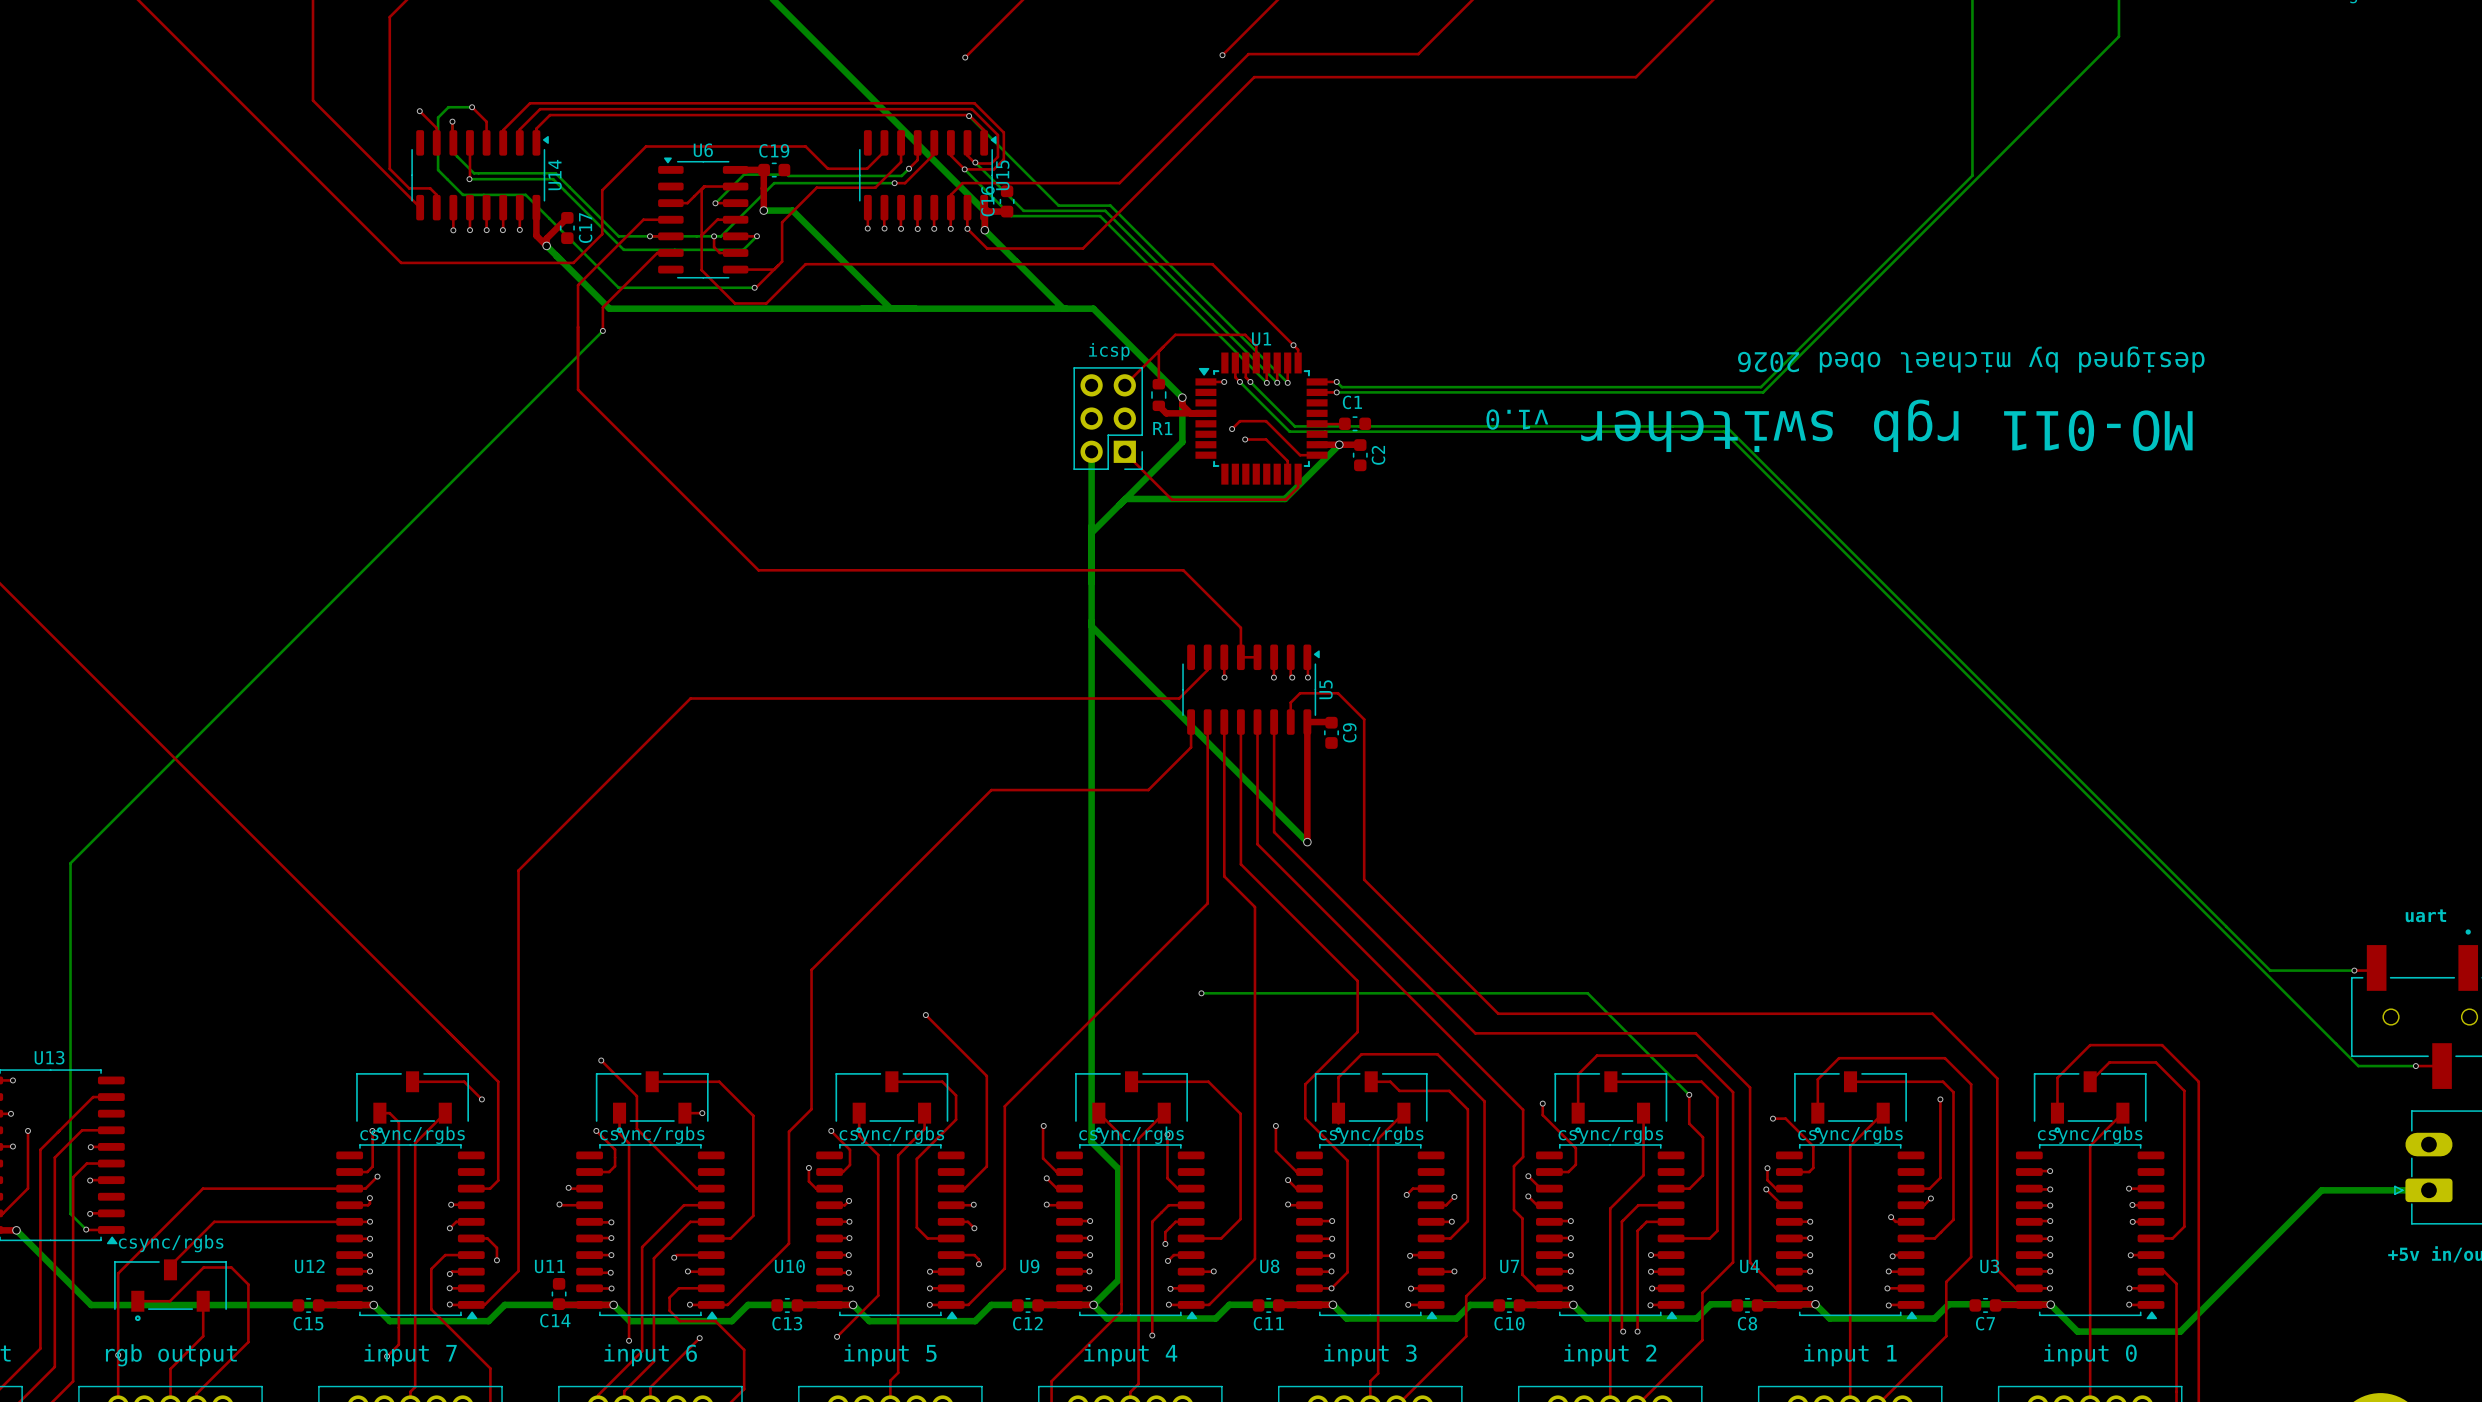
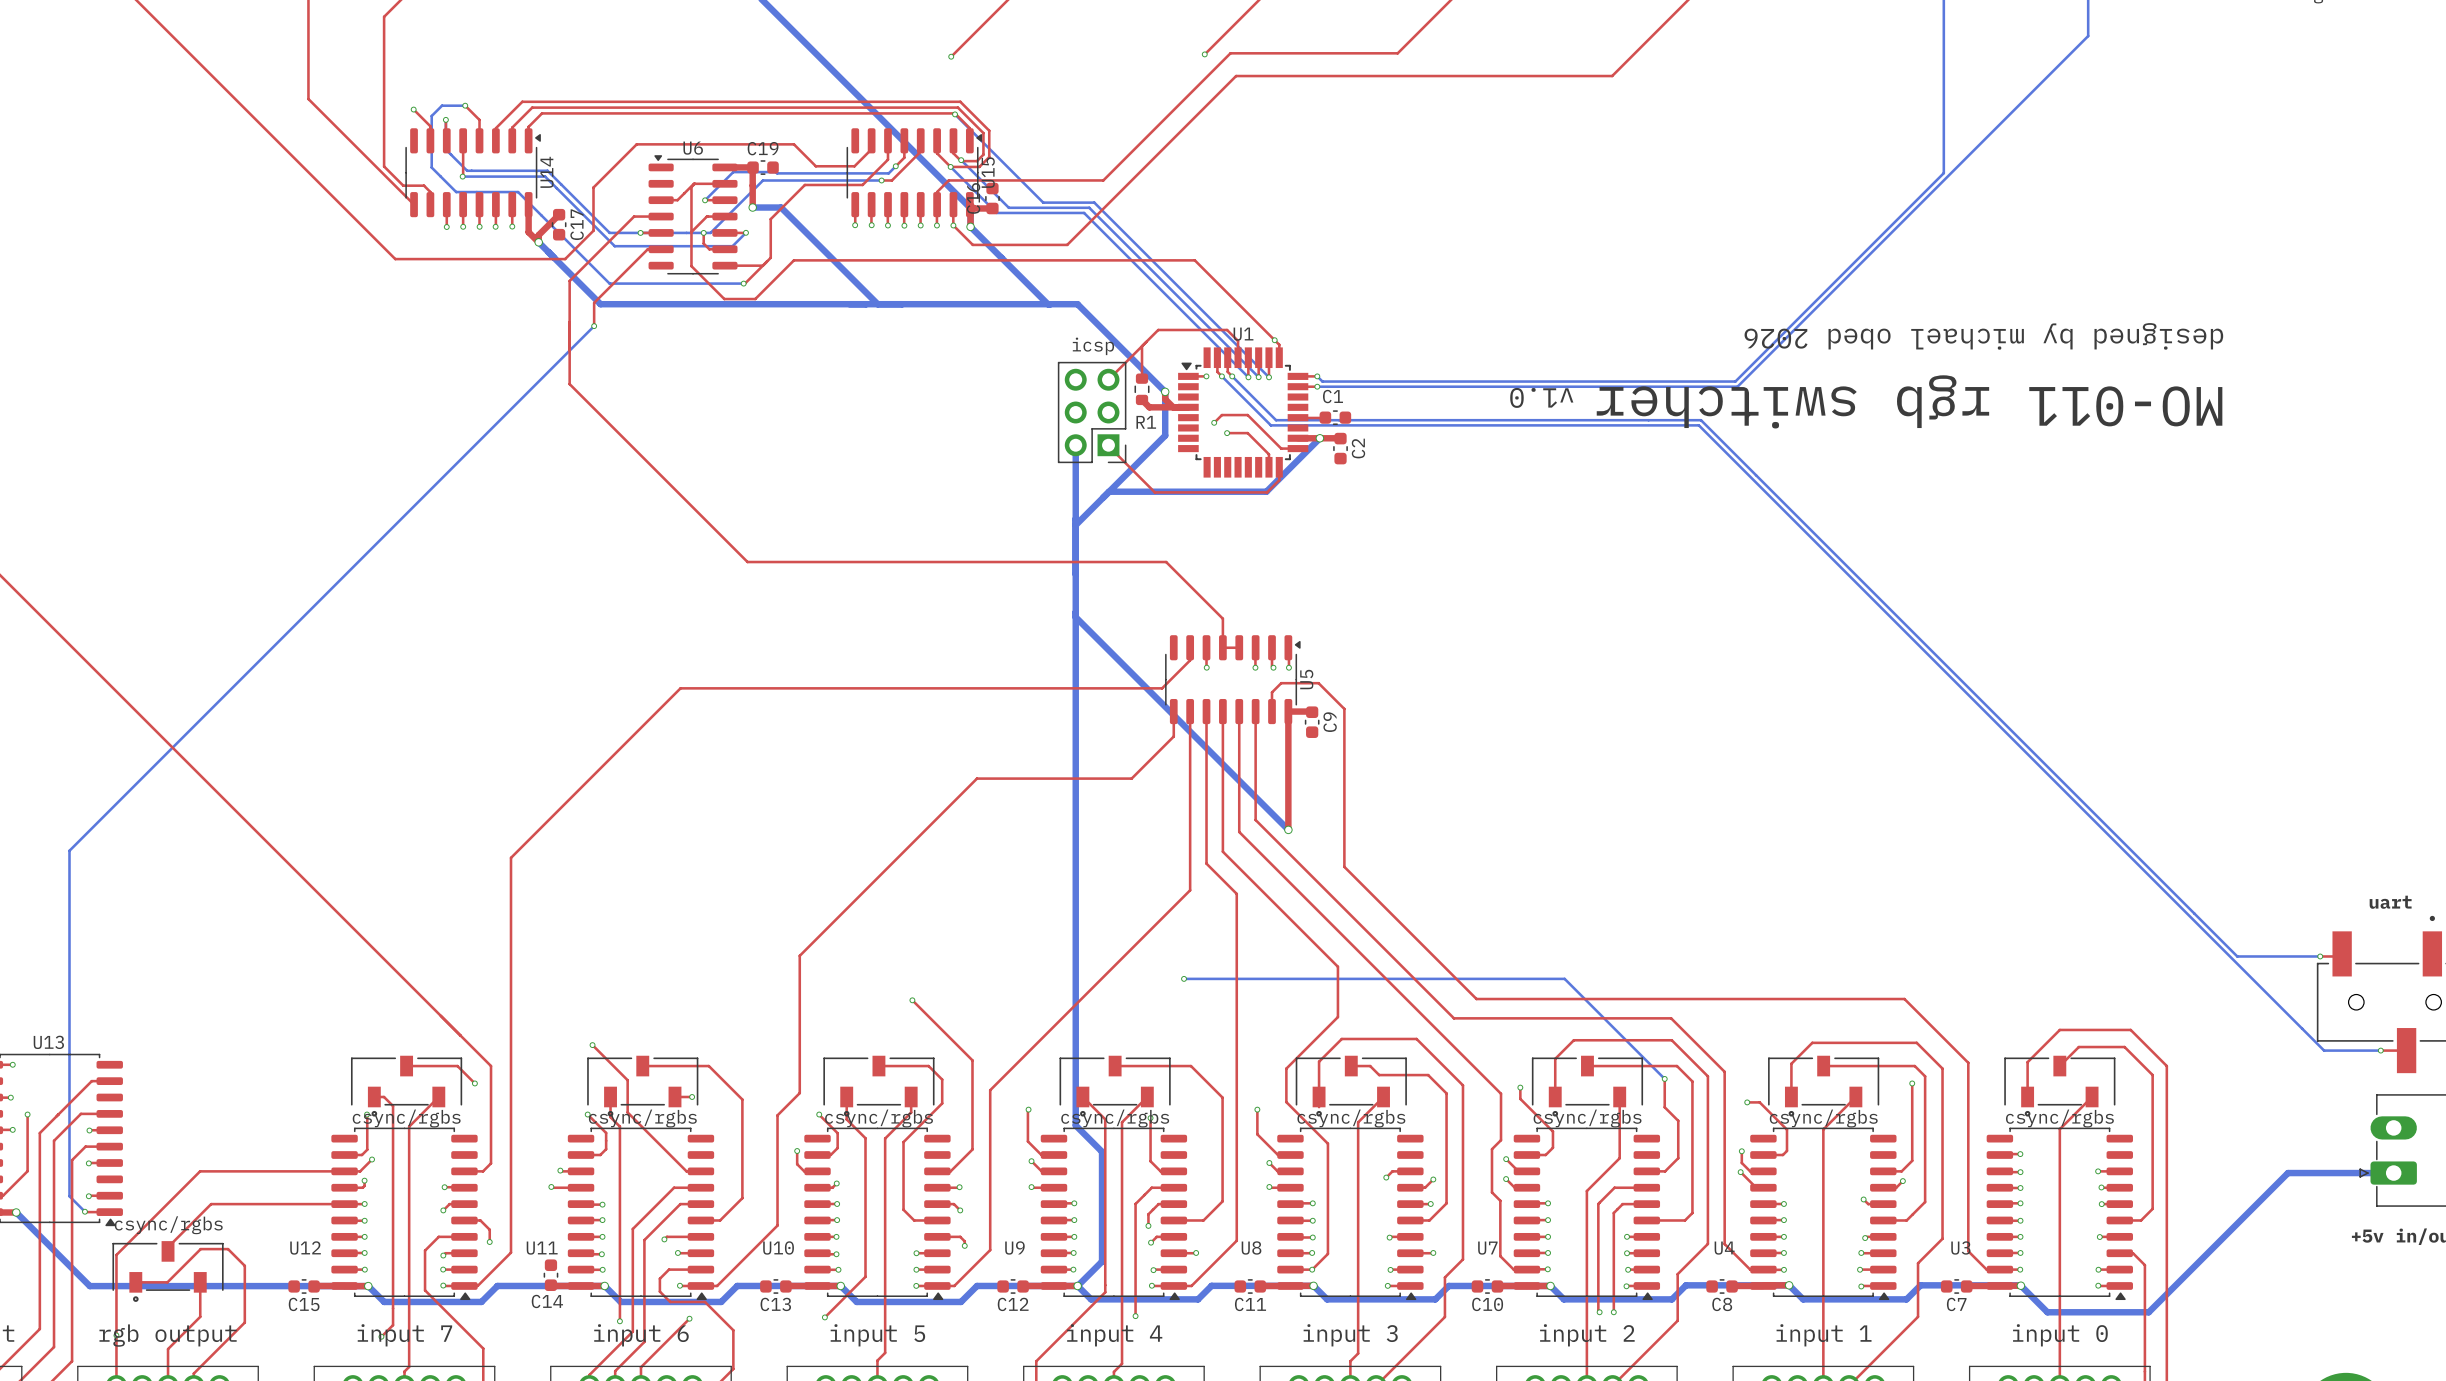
text position: designed by michael obed 2026 (1971, 359) -> designed by michael obed 2026 (1983, 336)
text position: v1.0 (1517, 419) -> v1.0 (1541, 397)
text position: MO-011 rgb switcher (1886, 425) -> MO-011 rgb switcher (1909, 401)

